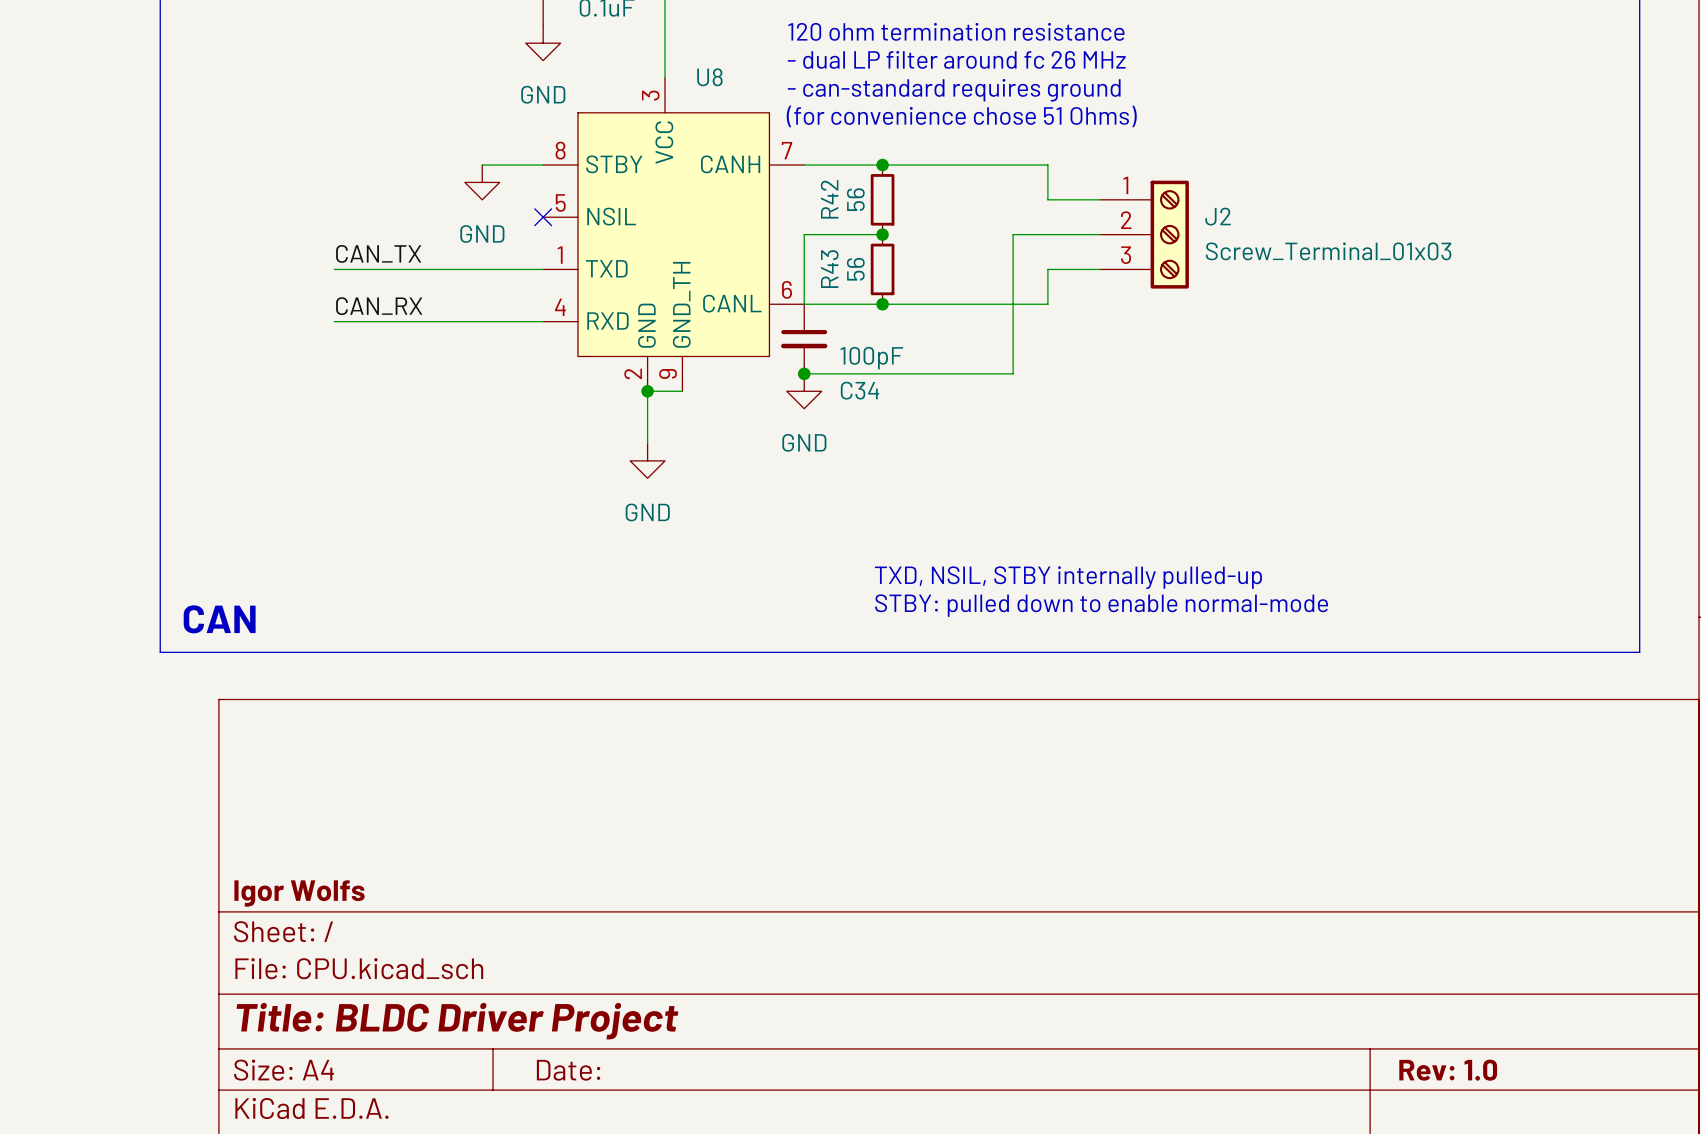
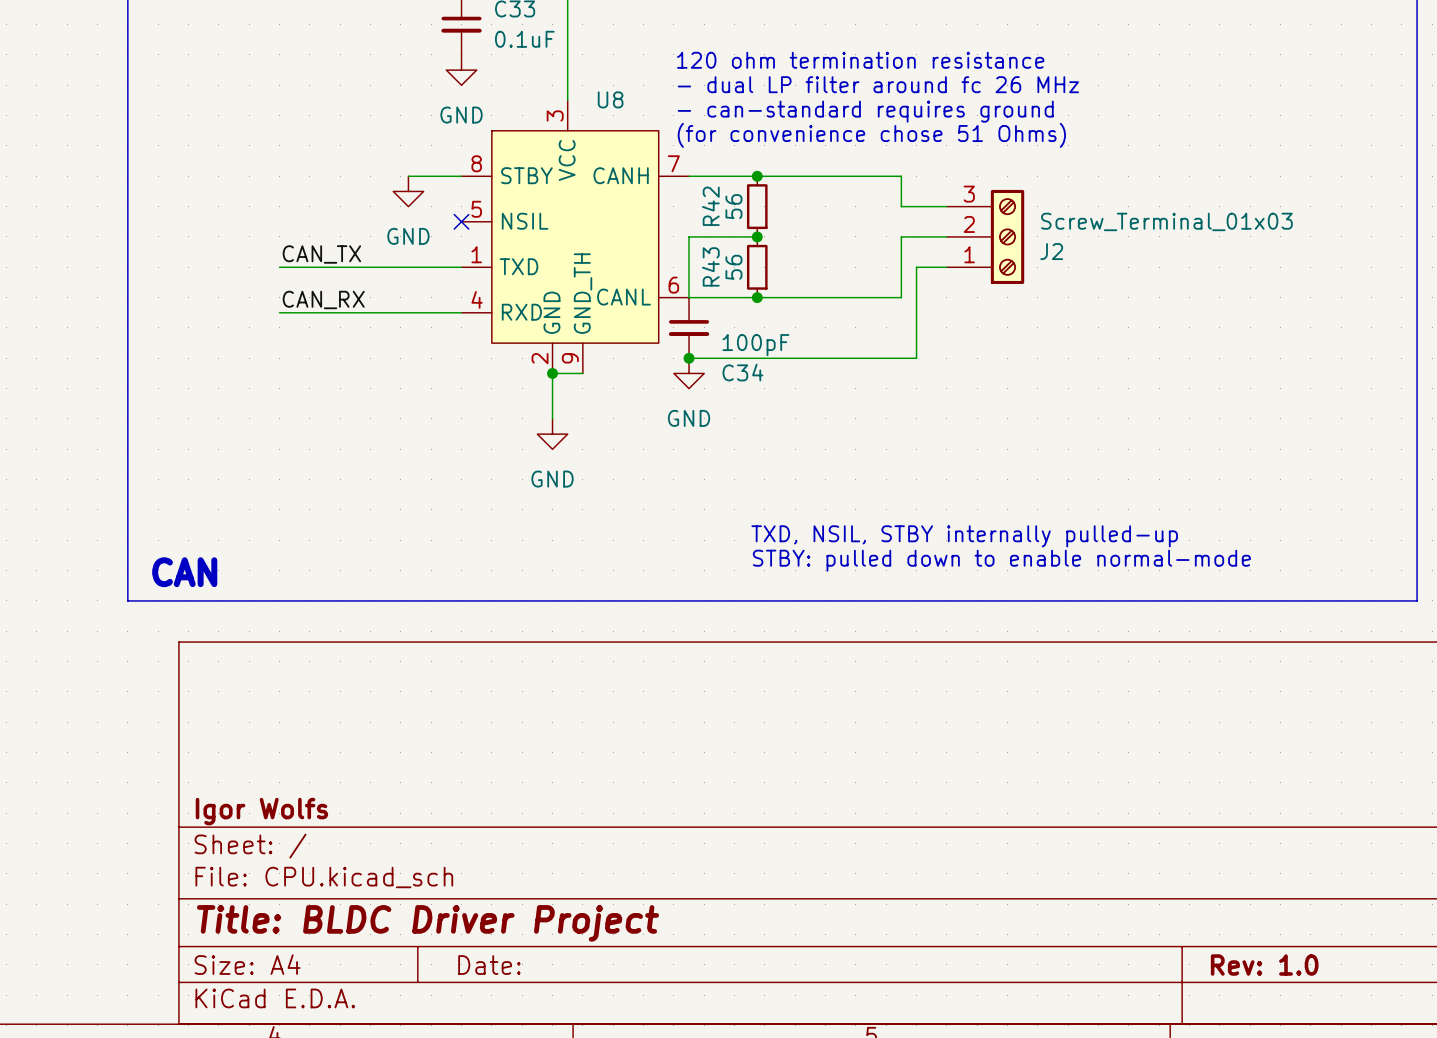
wire: (1047, 234) (1013, 234) (1013, 373) -> (916, 267) (916, 358) (871, 358)
J2 flip: as is (1169, 234) -> up-down (1007, 236)
wire: (1047, 269) (1065, 269) -> (901, 267) (901, 236)

